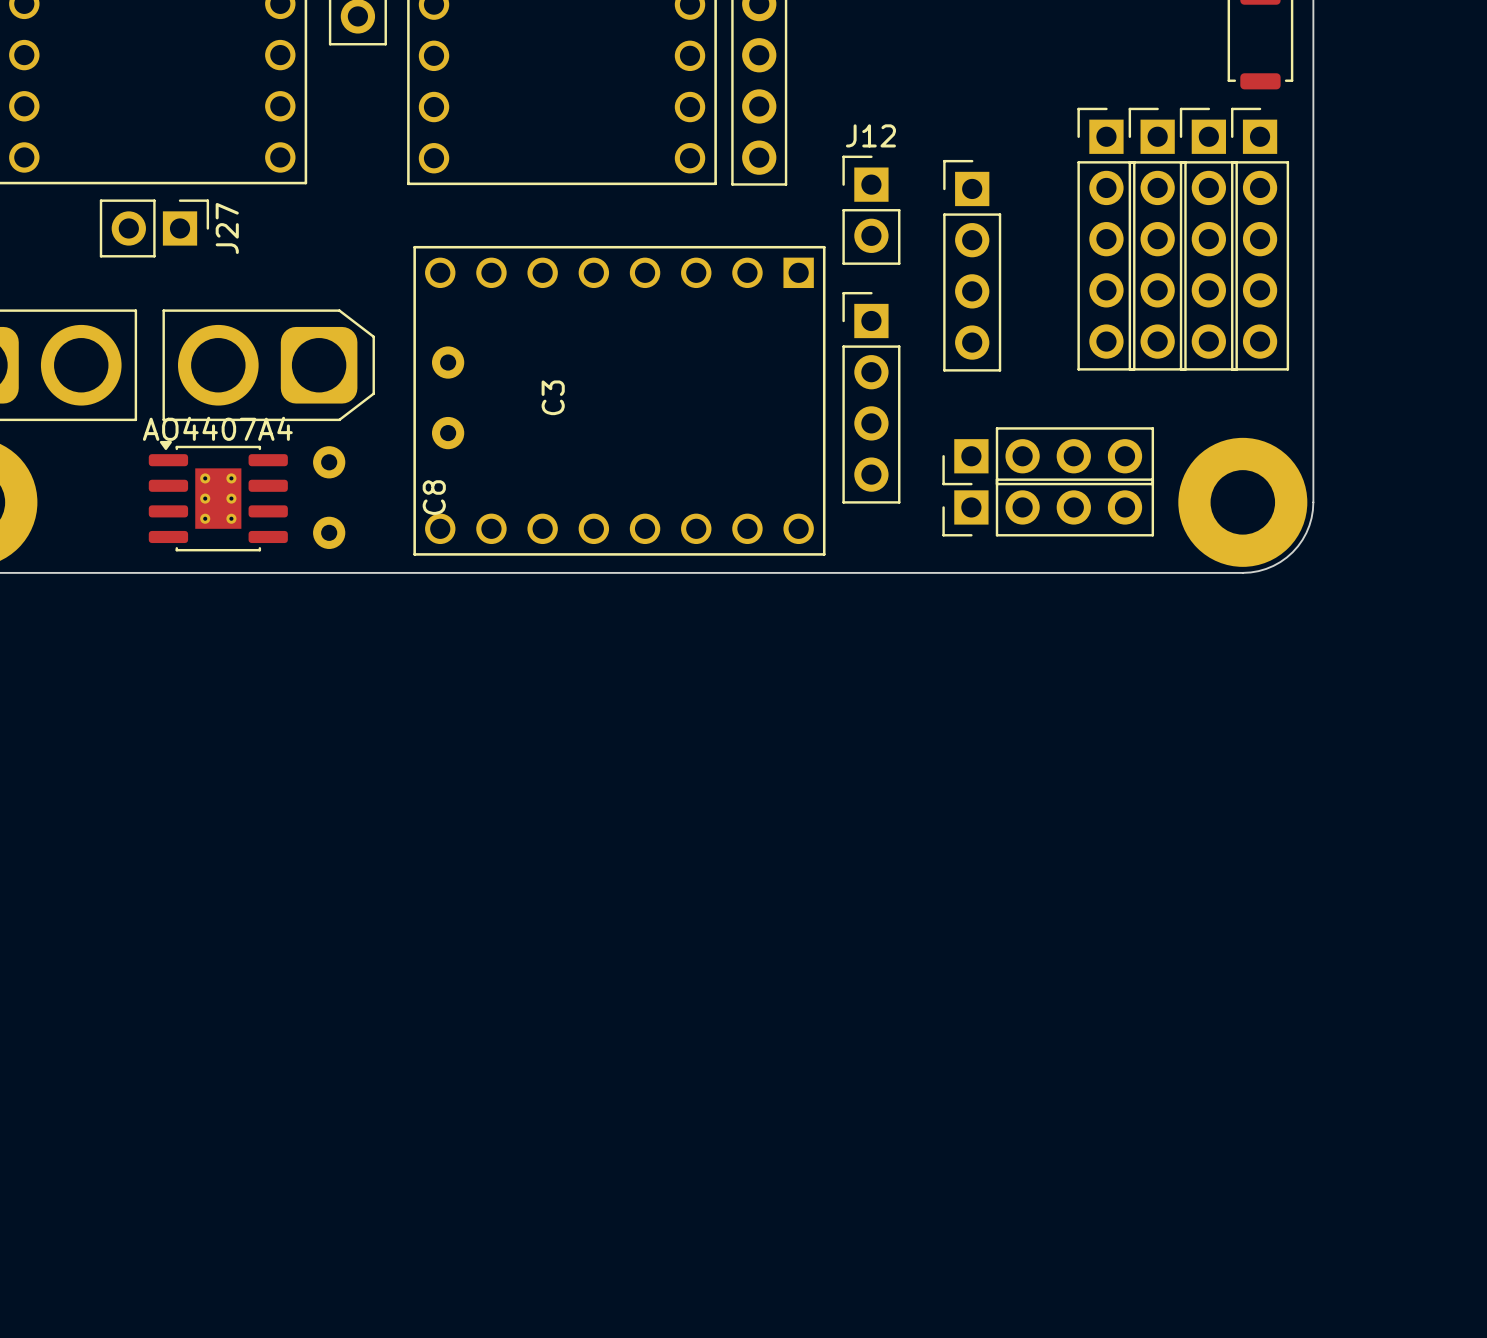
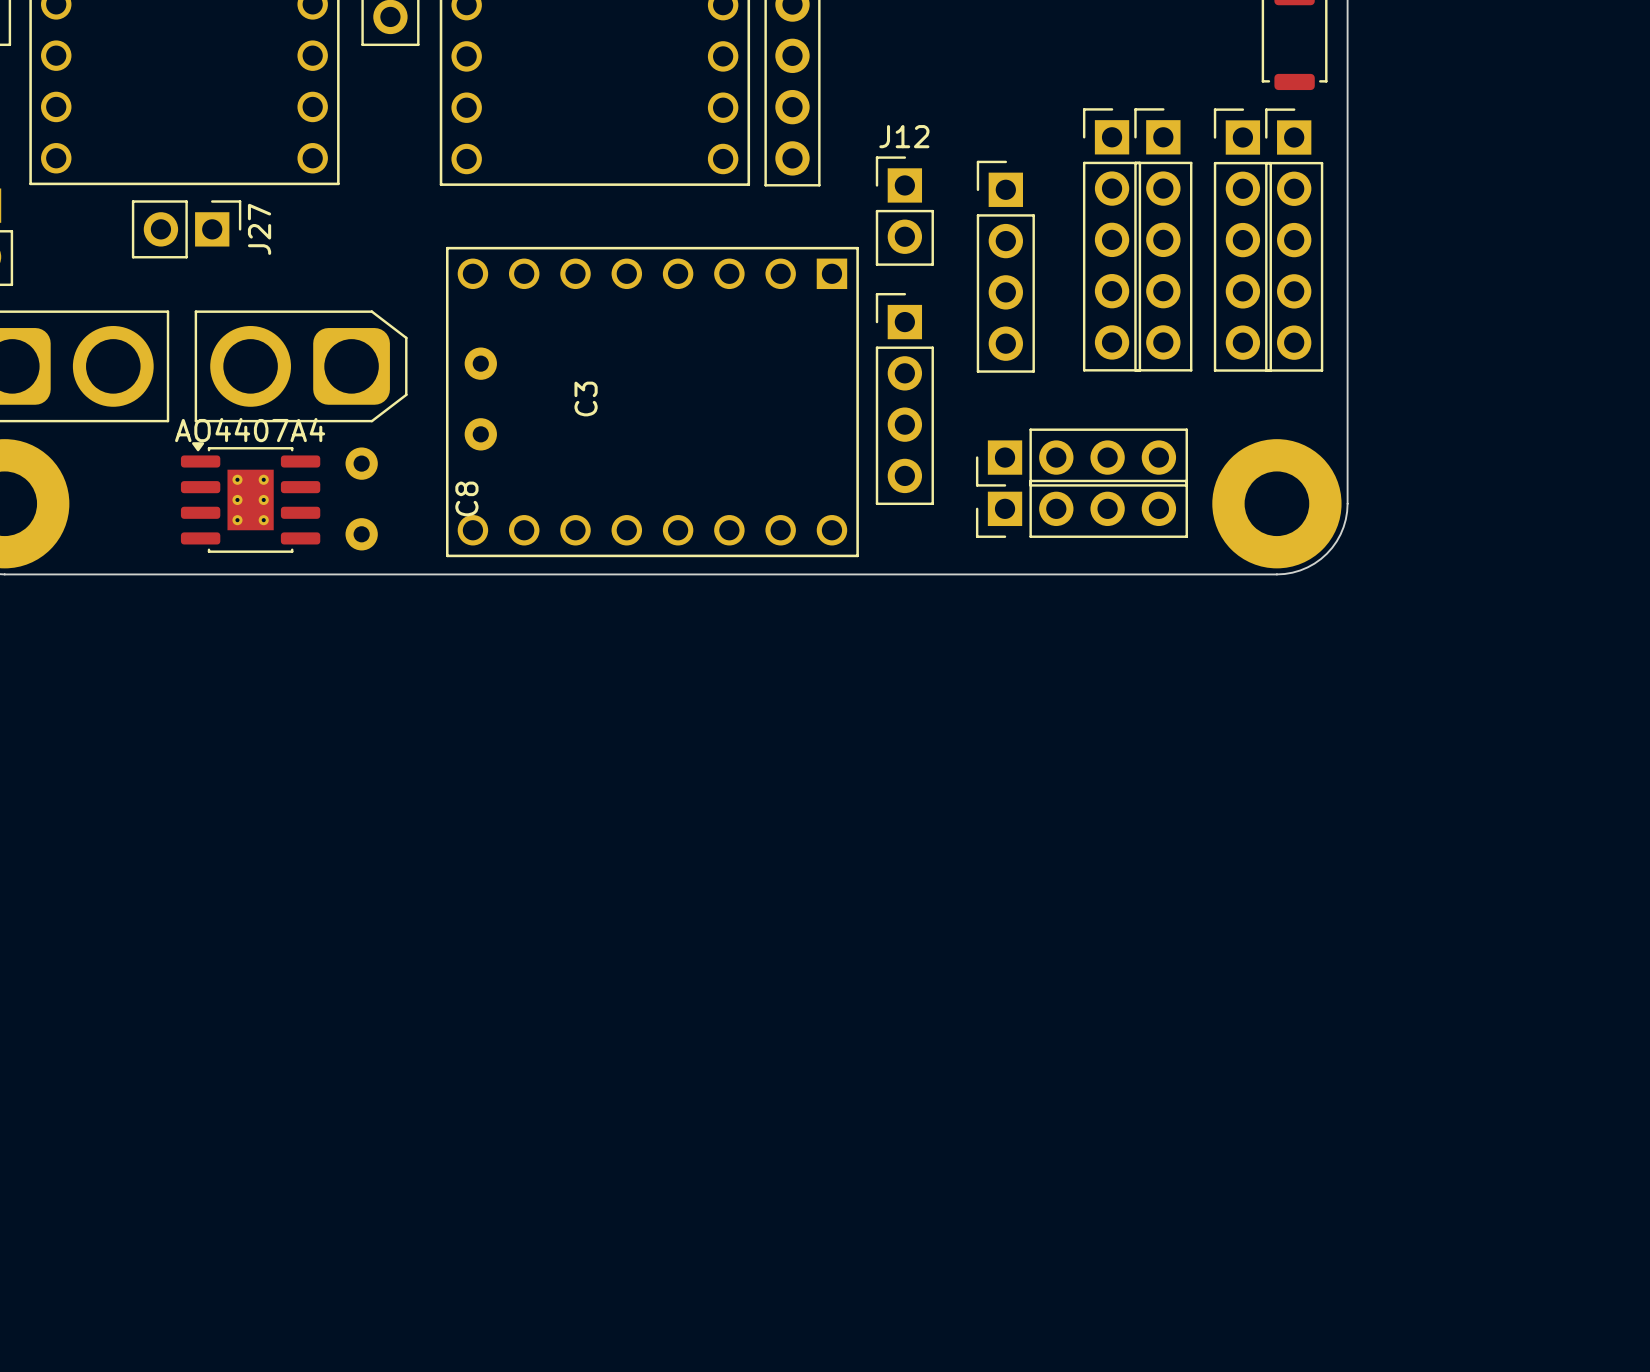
part: none -> (1112, 239)
part: none -> (1163, 239)
part: (1106, 239) -> none
part: (1157, 239) -> none

